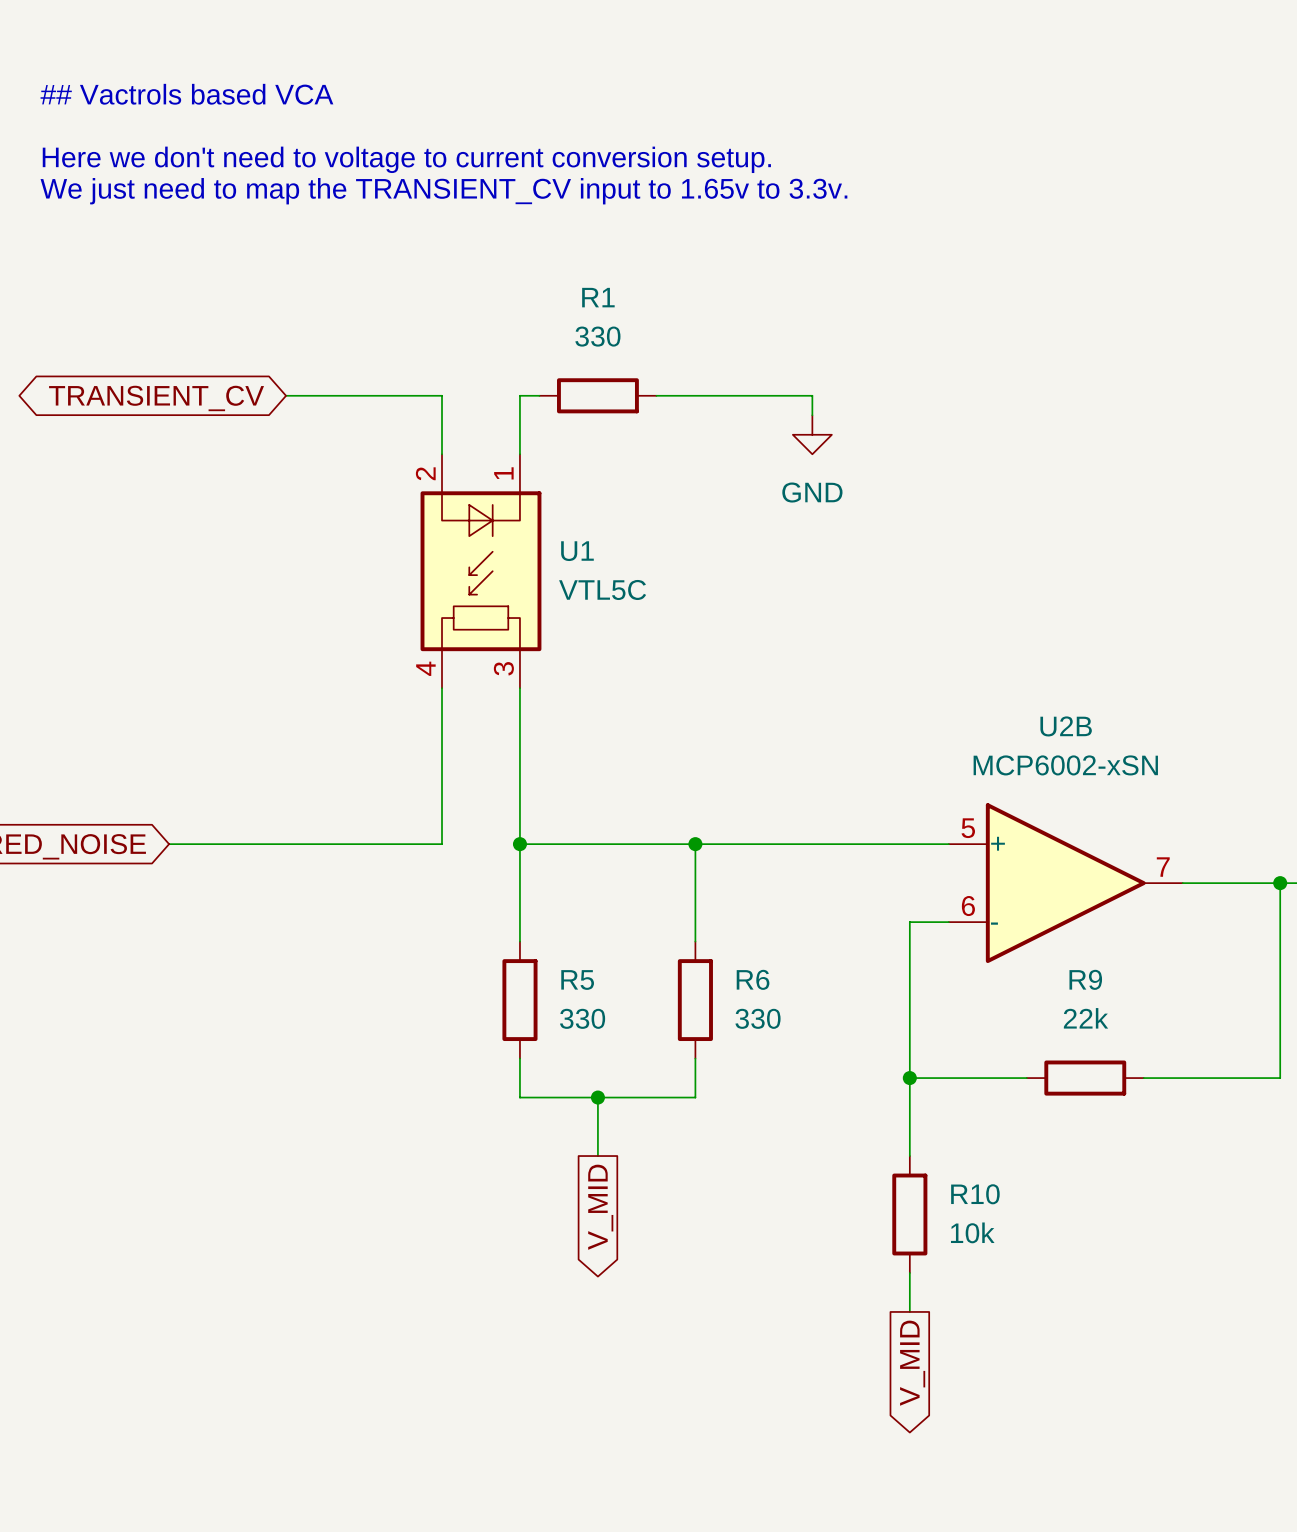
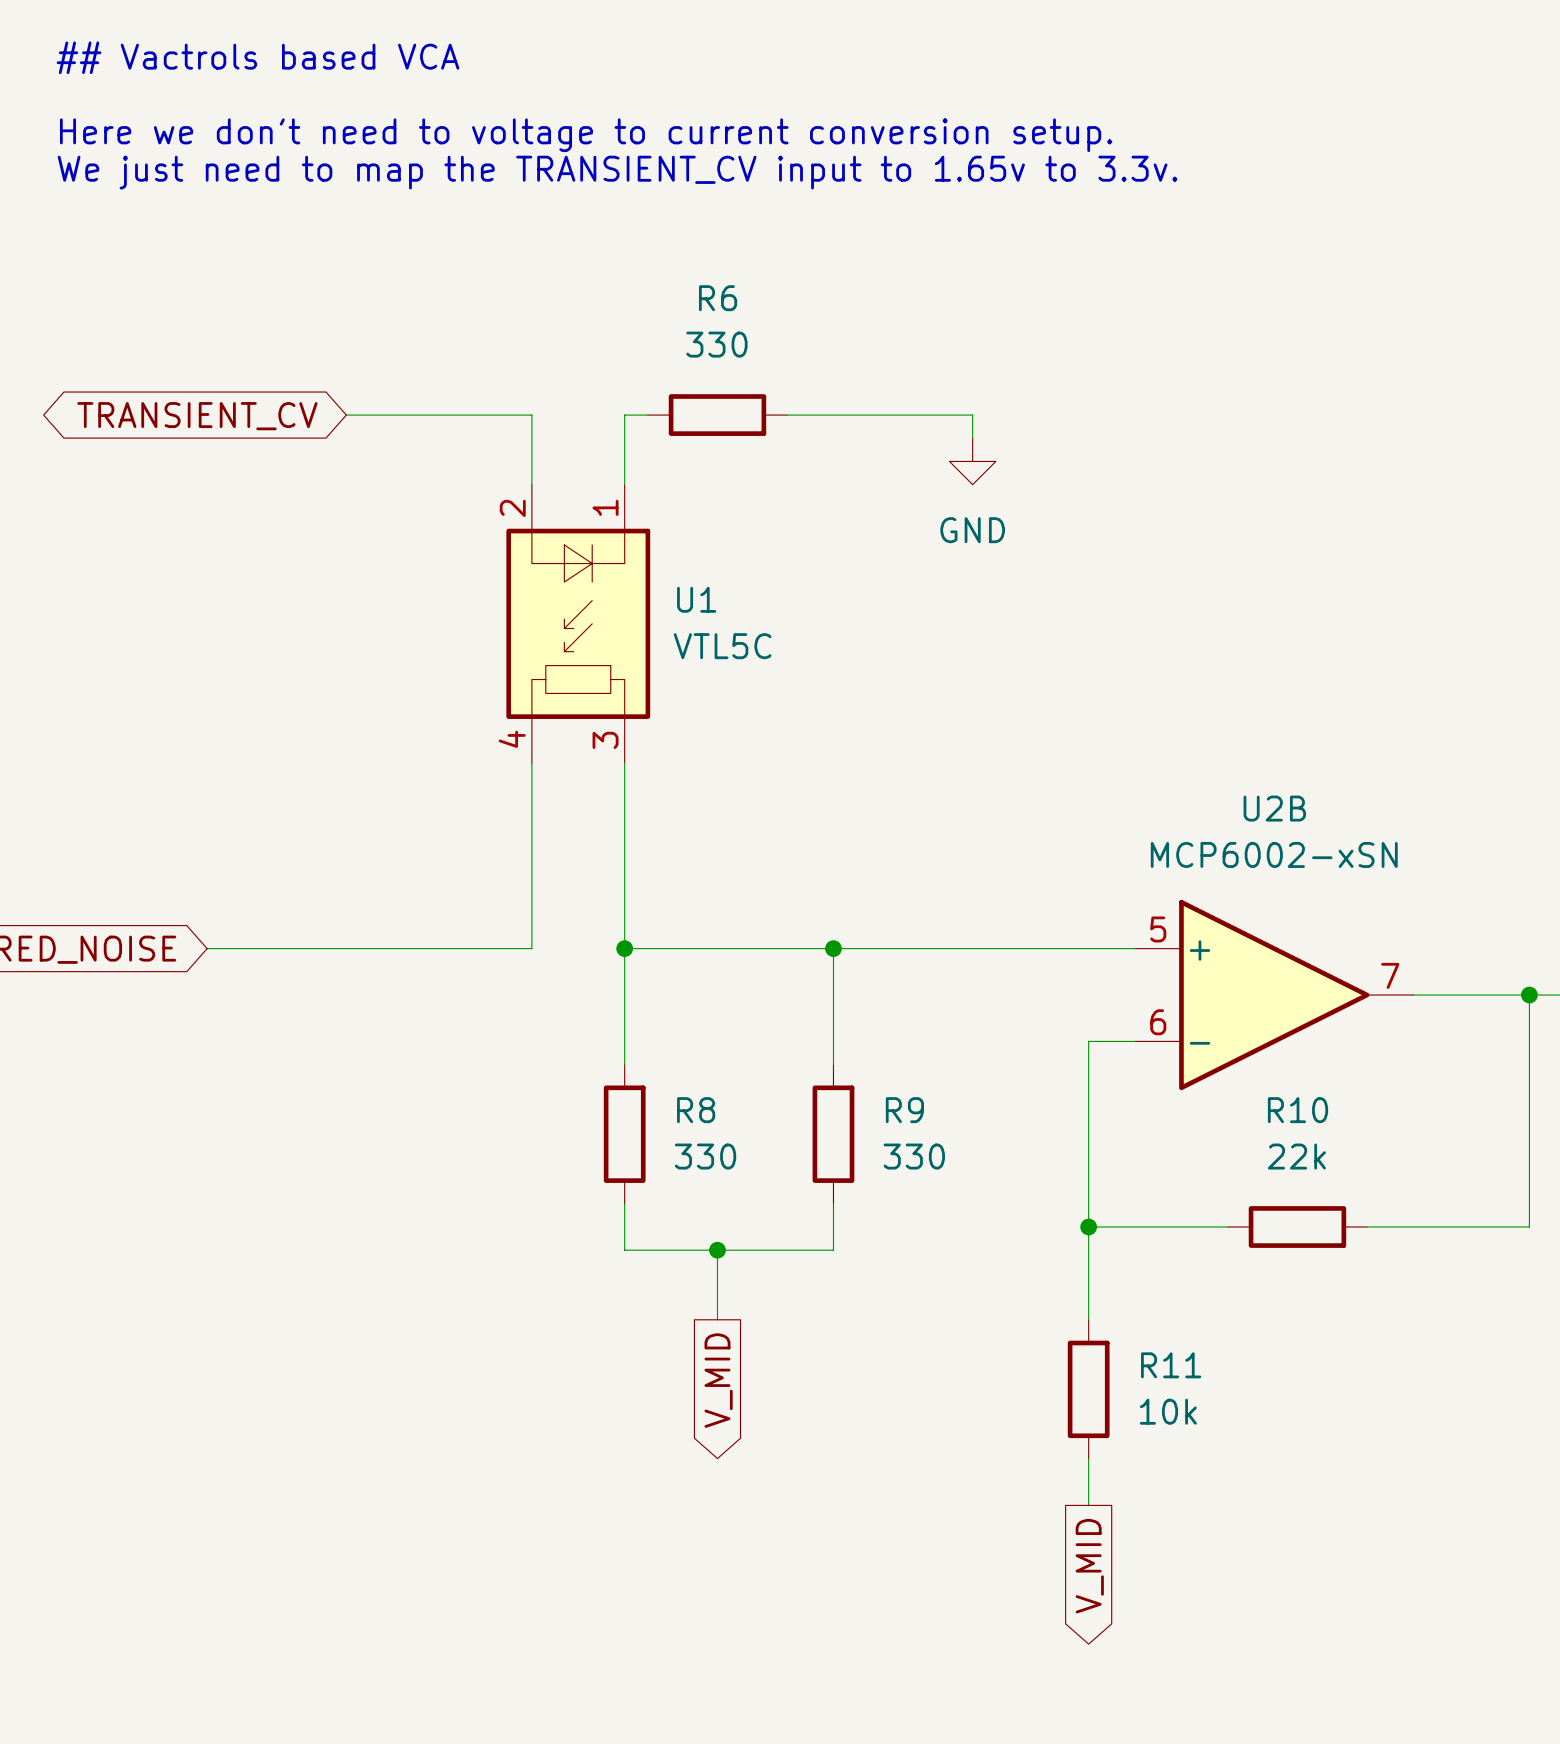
R1 name: R1 (598, 297) -> R6 (718, 298)
R5 name: R5 (577, 979) -> R8 (696, 1110)
R6 name: R6 (753, 979) -> R9 (904, 1110)
R9 name: R9 (1085, 979) -> R10 (1297, 1110)
R10 name: R10 (975, 1194) -> R11 (1171, 1365)

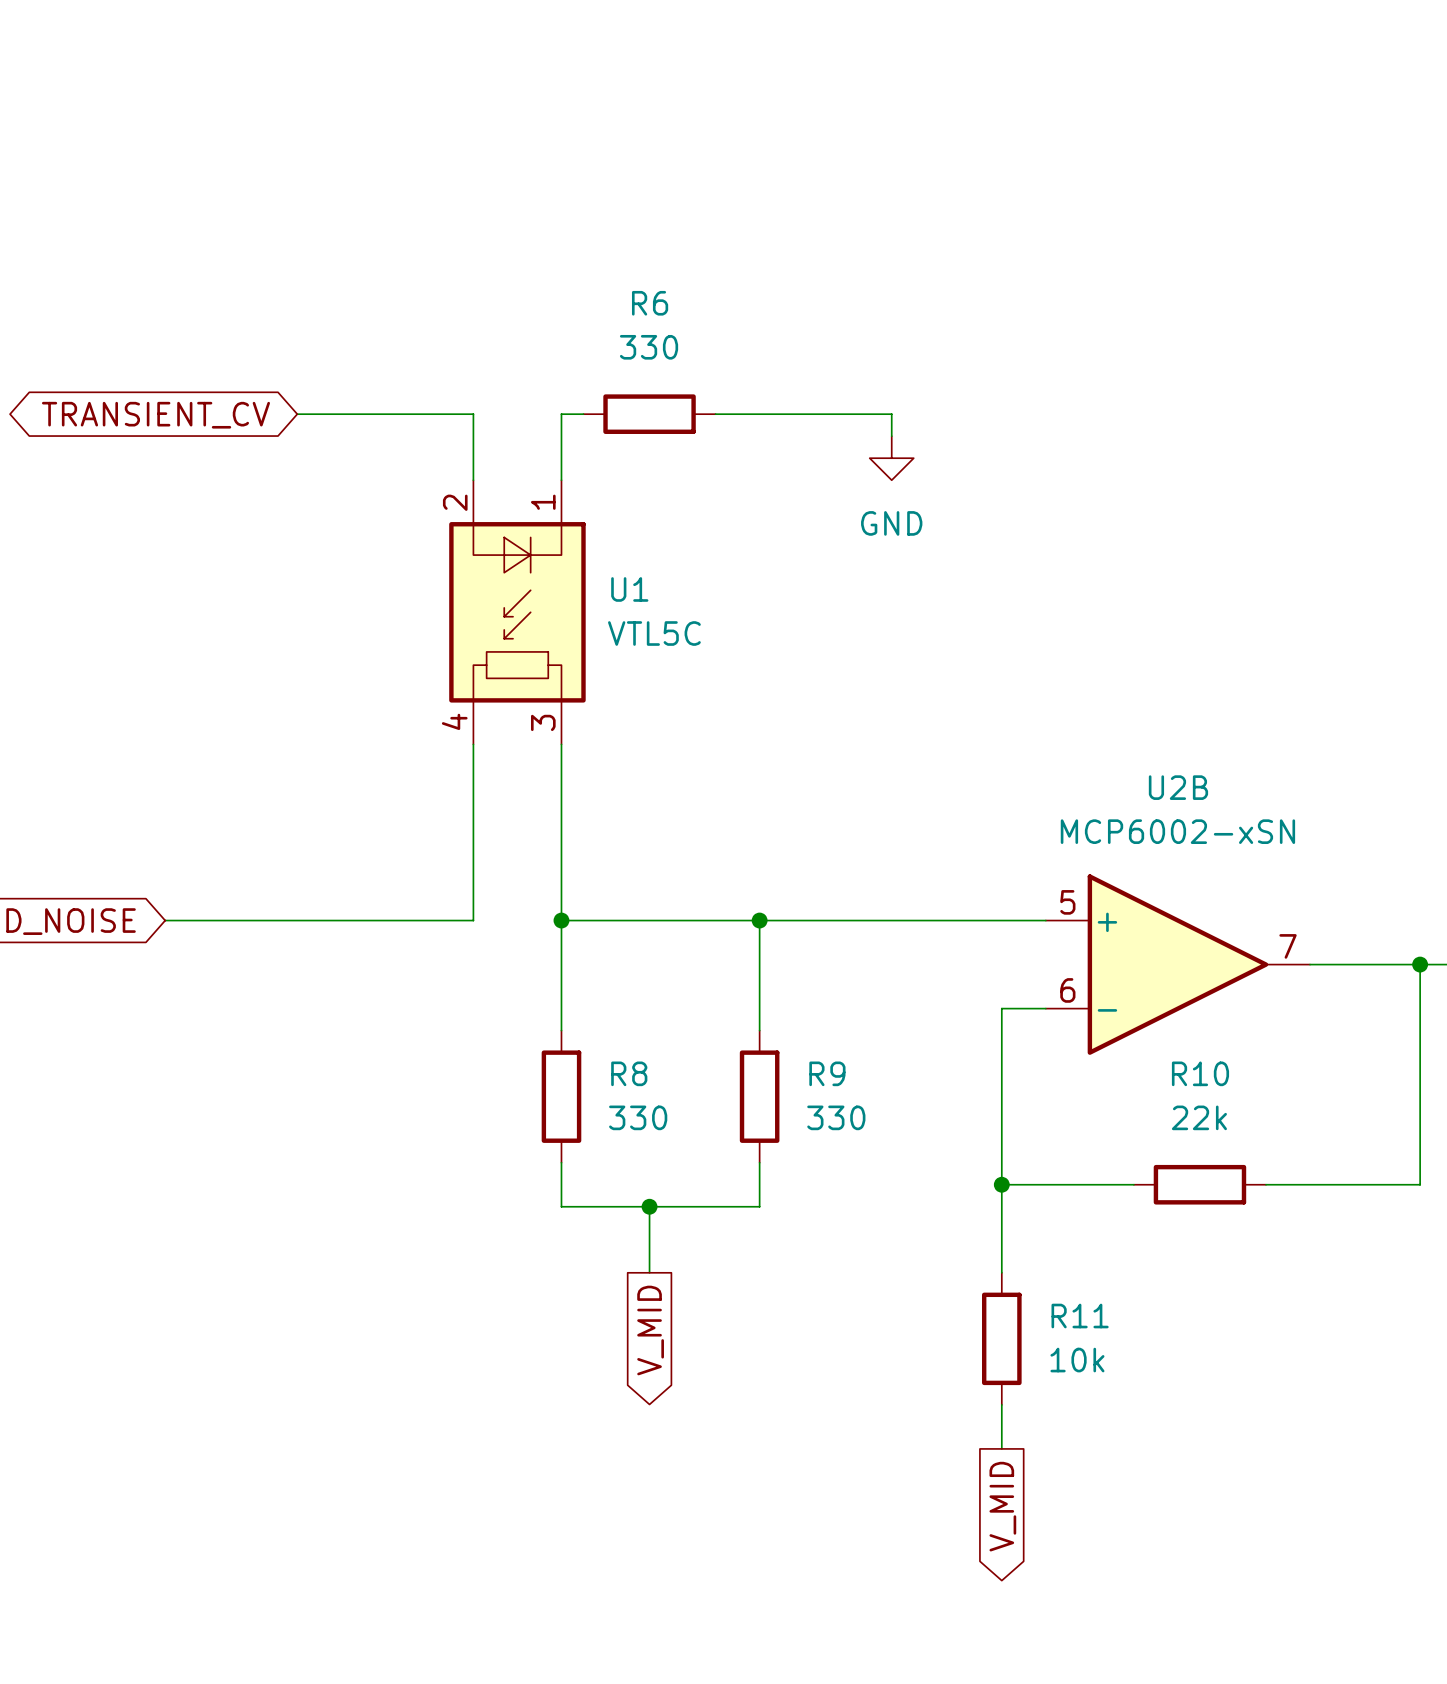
text: ## Vactrols based VCA (257, 57) -> none
text: Here we don't need to voltage to current conversion setup. (586, 135) -> none
text: We just need to map the TRANSIENT_CV input to 1.65v to 3.3v. (617, 172) -> none

